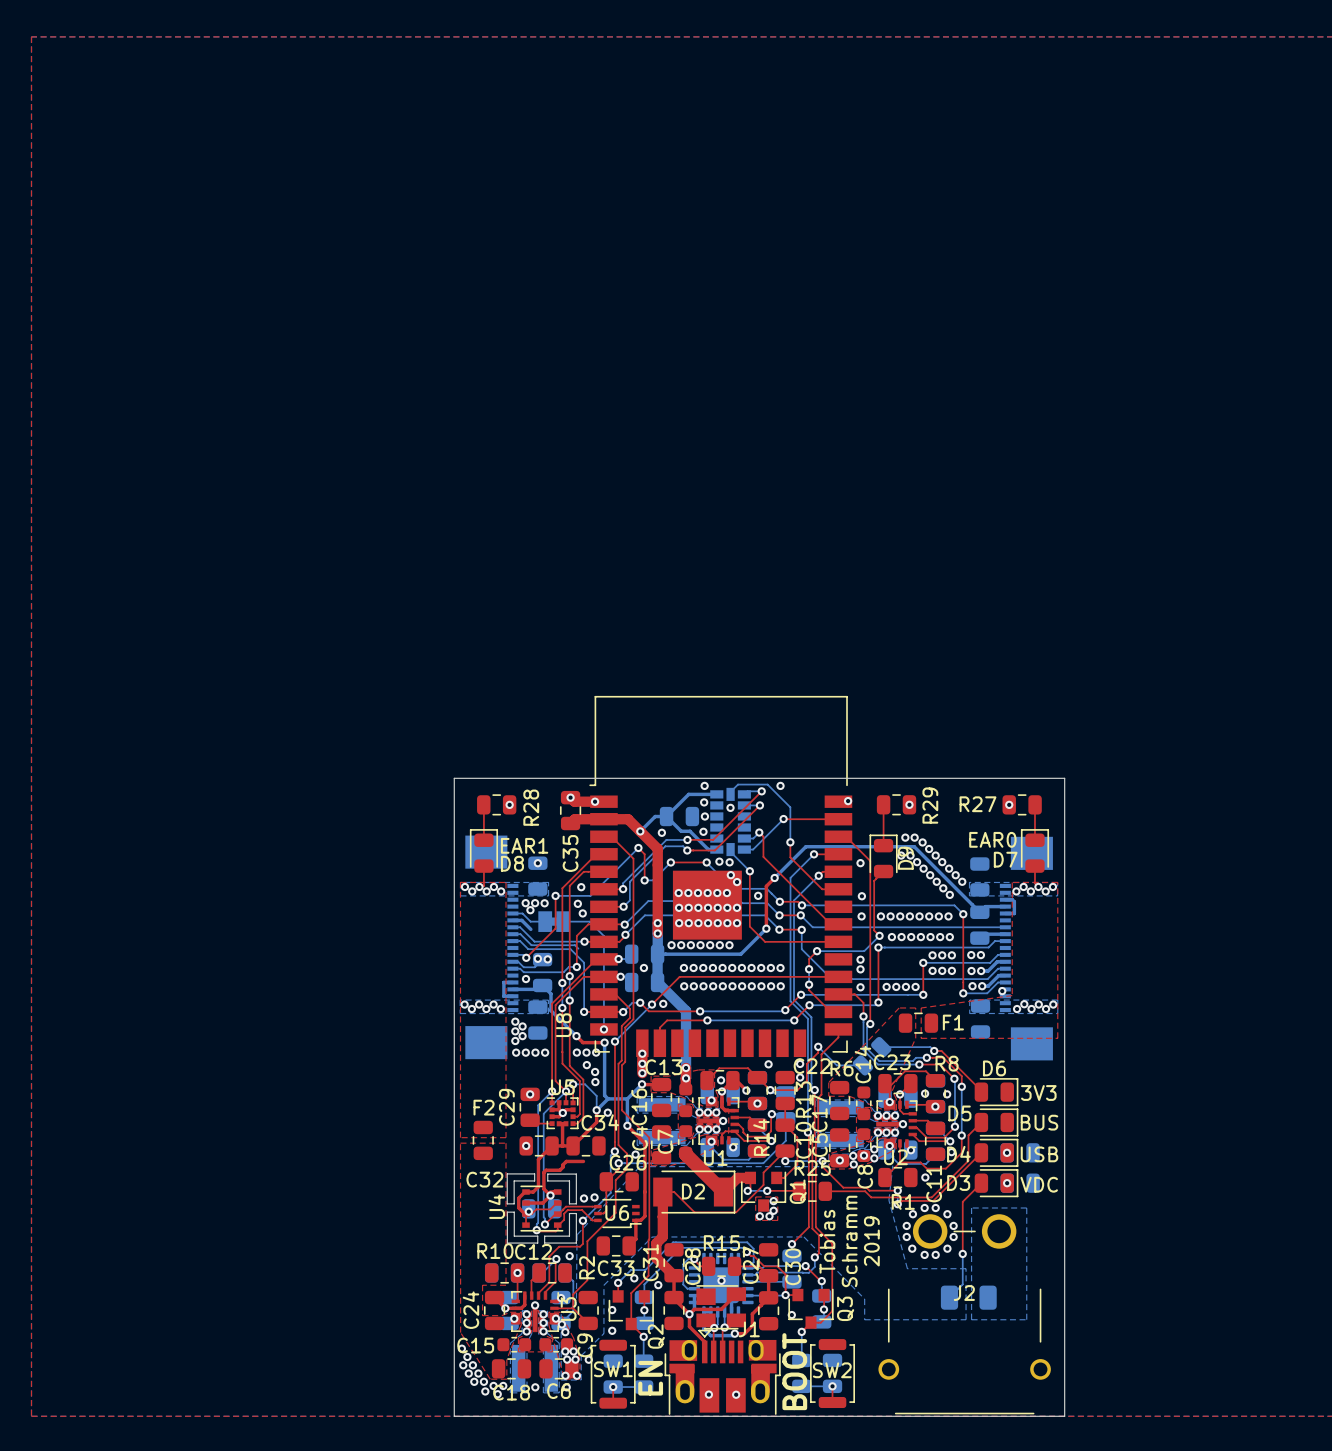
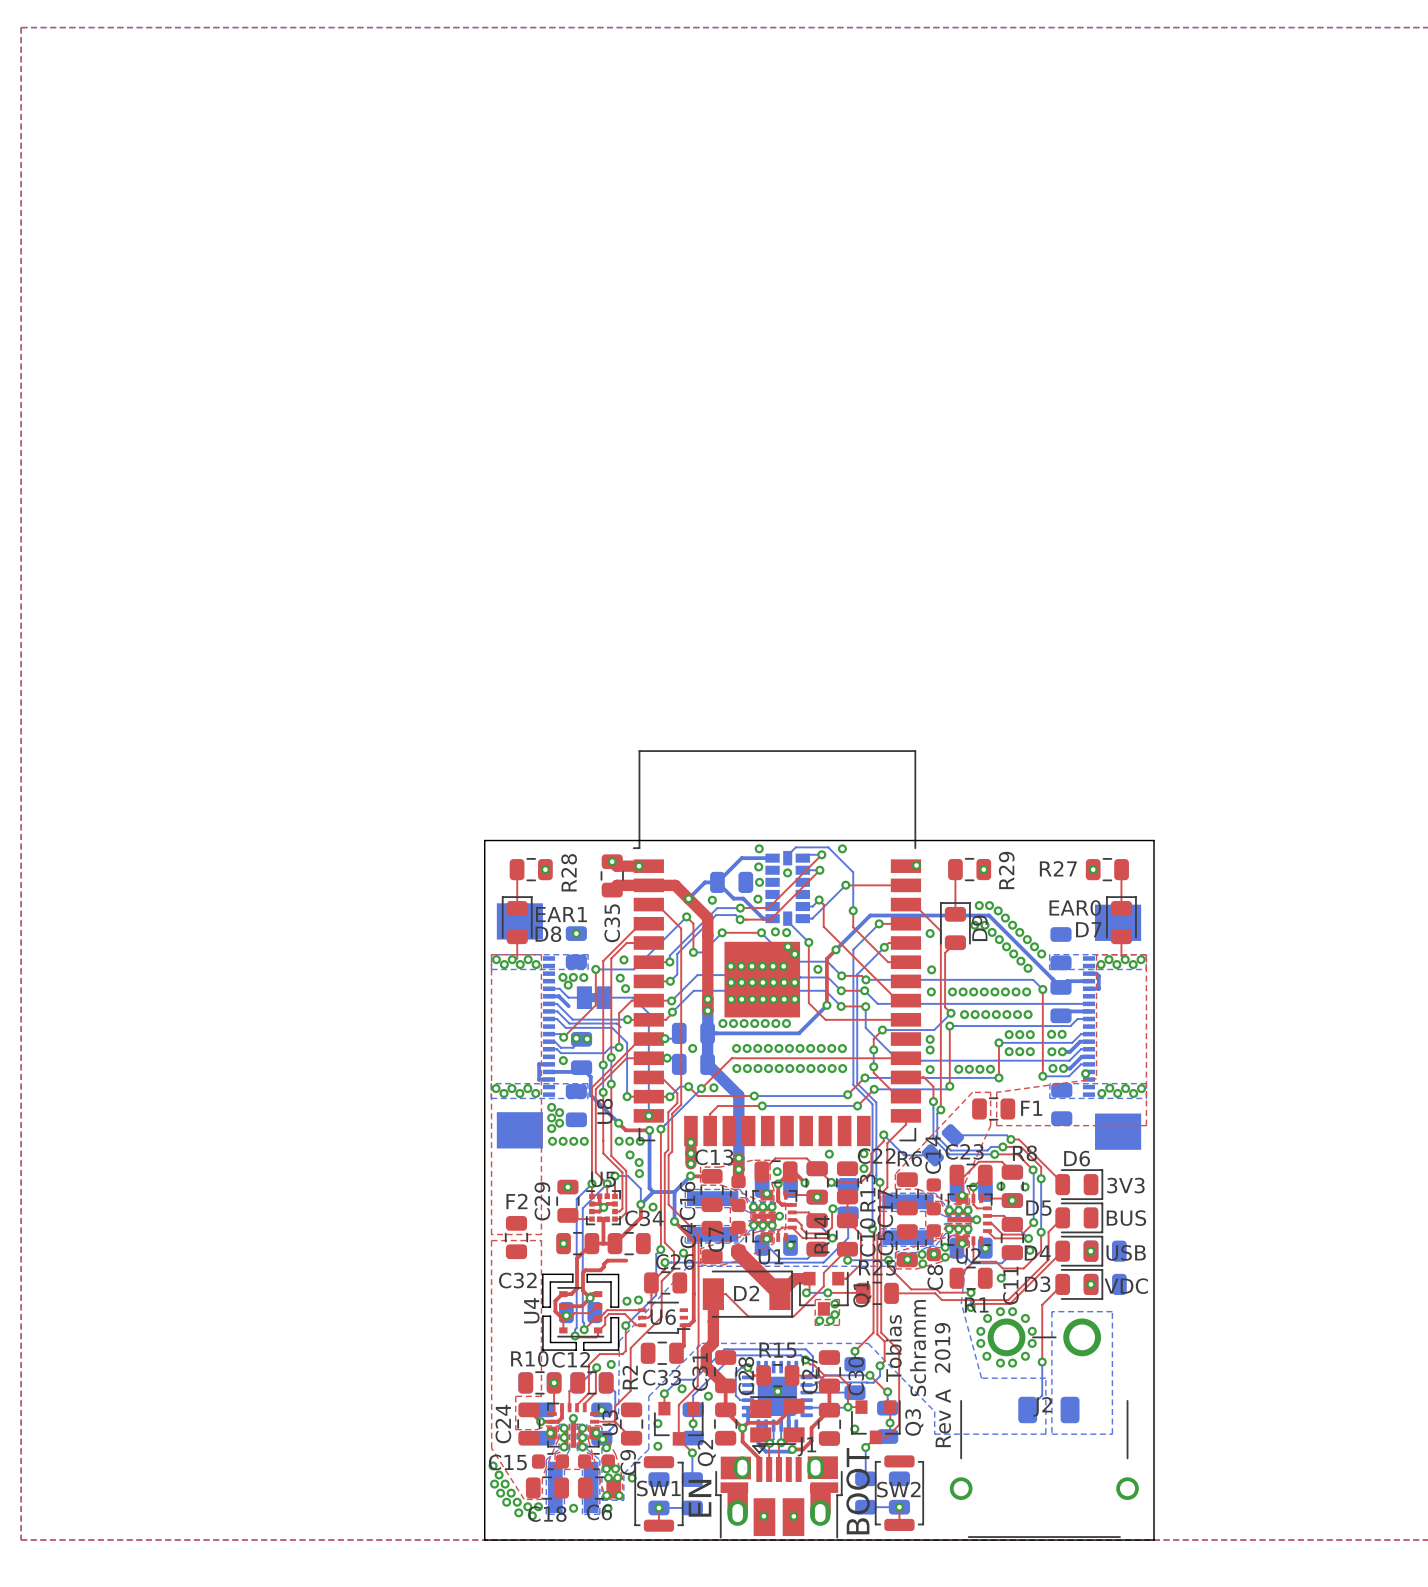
text: none -> Rev A (943, 1418)

